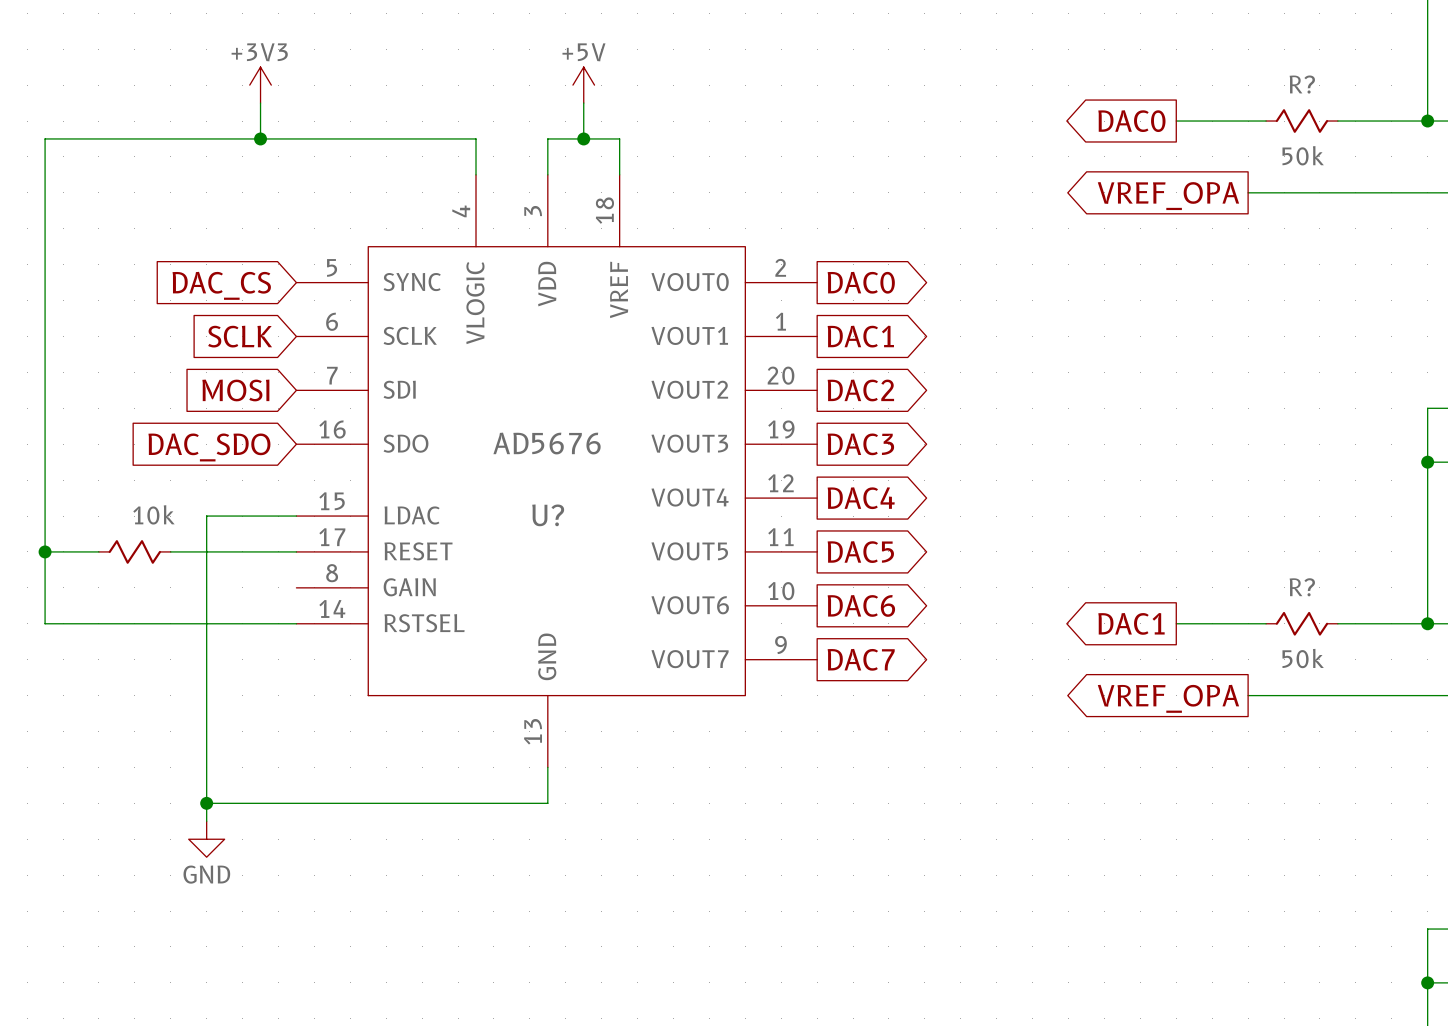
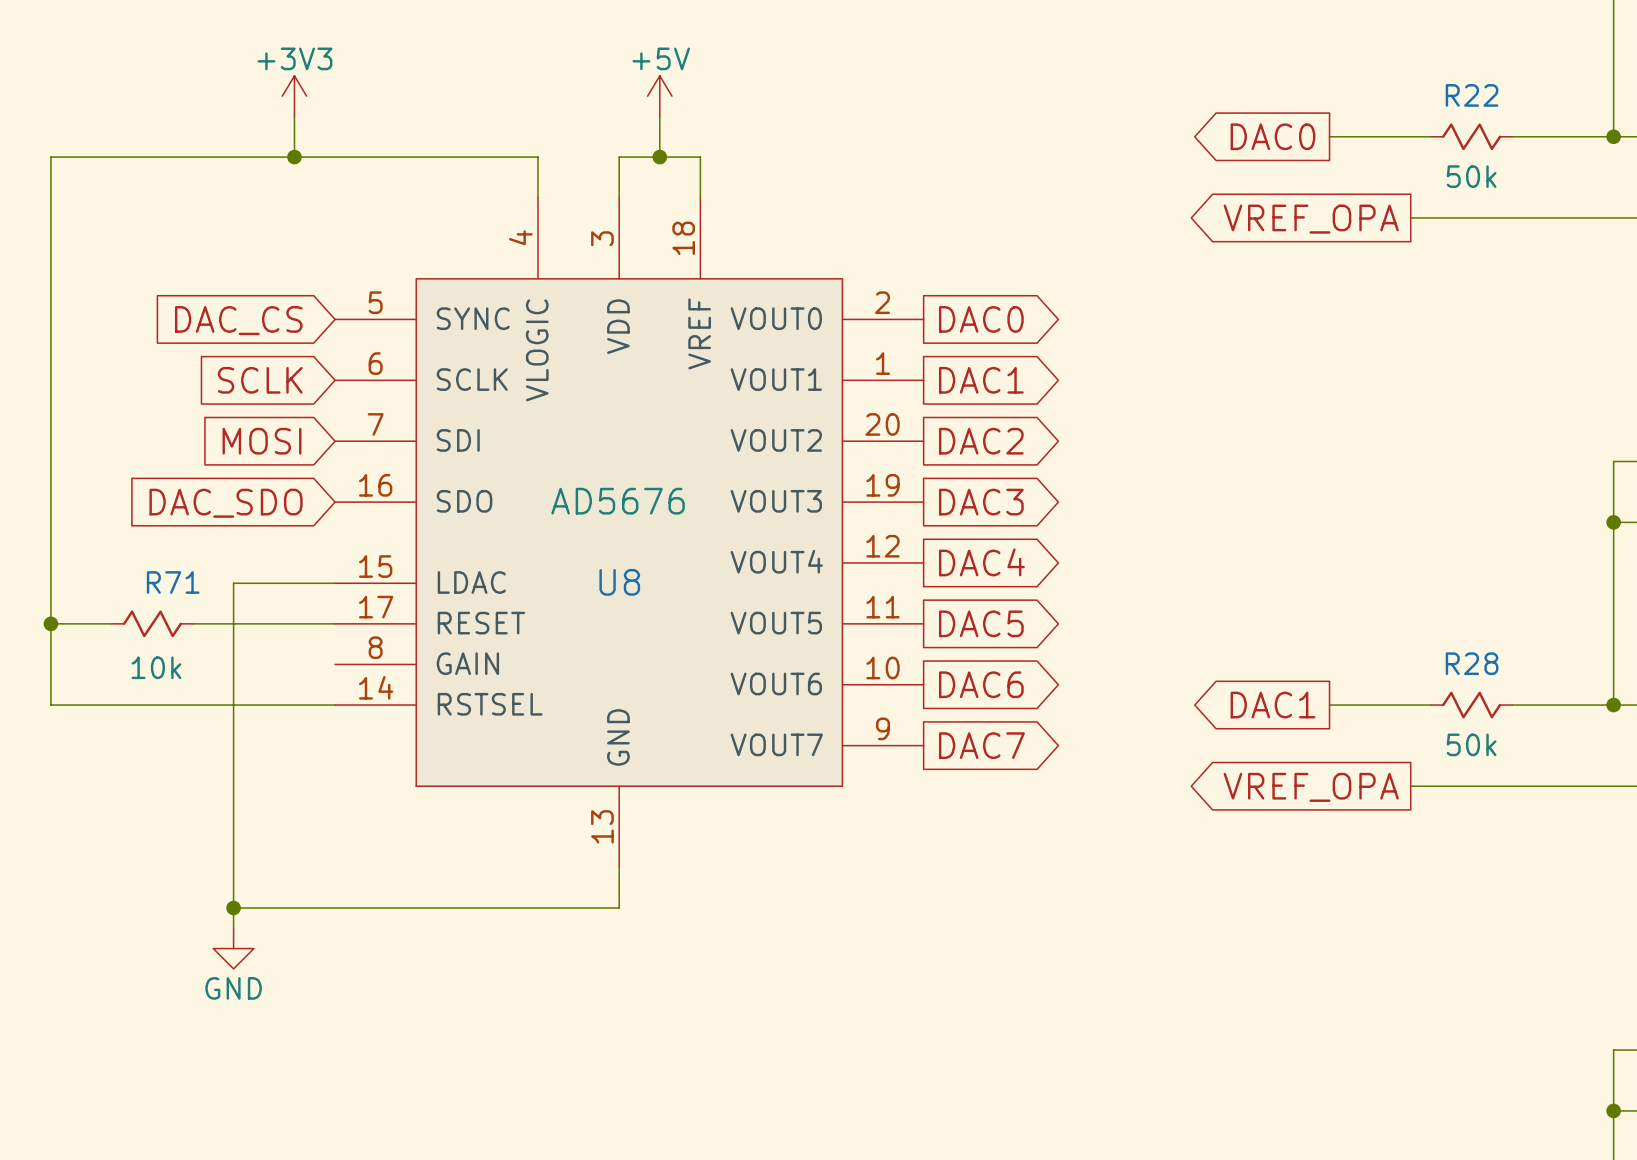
R? name: R? (1302, 84) -> R22 (1472, 95)
10k name: 10k (153, 514) -> R71 (173, 582)
U? name: U? (548, 515) -> U8 (619, 582)
R? name: R? (1302, 587) -> R28 (1472, 663)
10k value: none -> 10k (156, 667)

